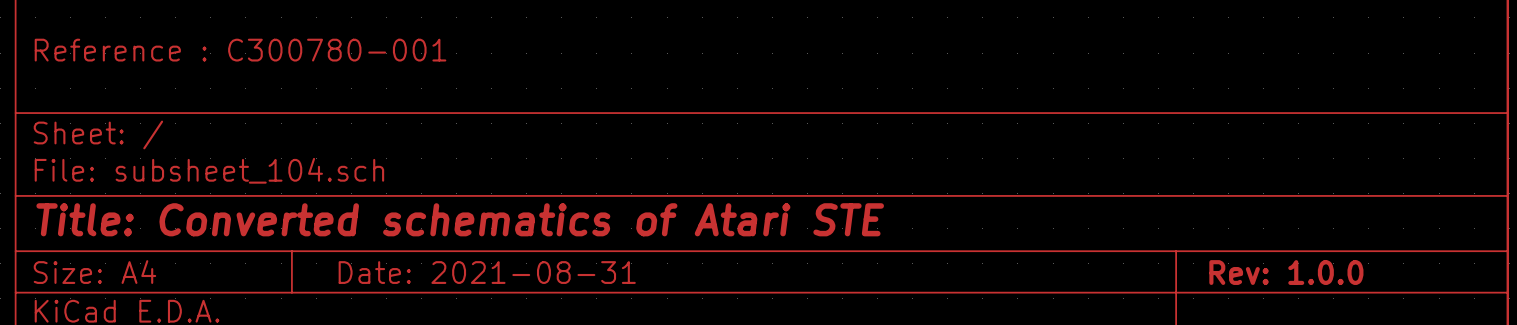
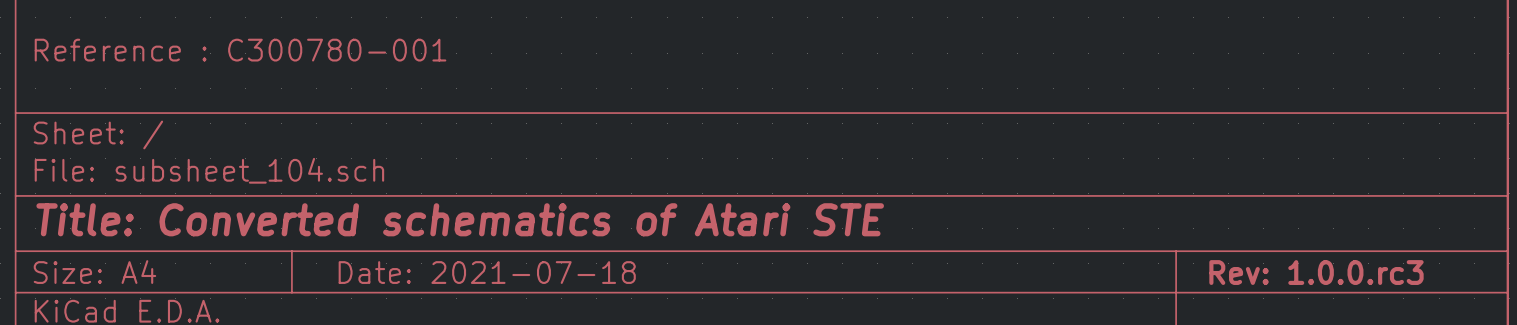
title block: Date: 2021-08-31 (487, 272) -> Date: 2021-07-18 (487, 272)
title block: Rev: 1.0.0 (1286, 272) -> Rev: 1.0.0.rc3 (1316, 272)

